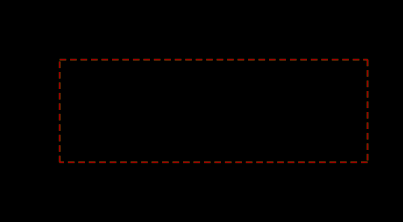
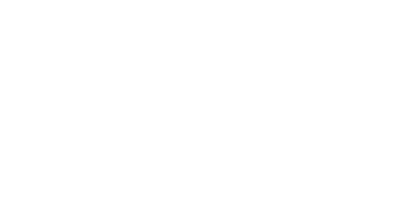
top zone outline: (59, 59) (367, 59) (367, 162) (59, 162) (59, 59) -> none

